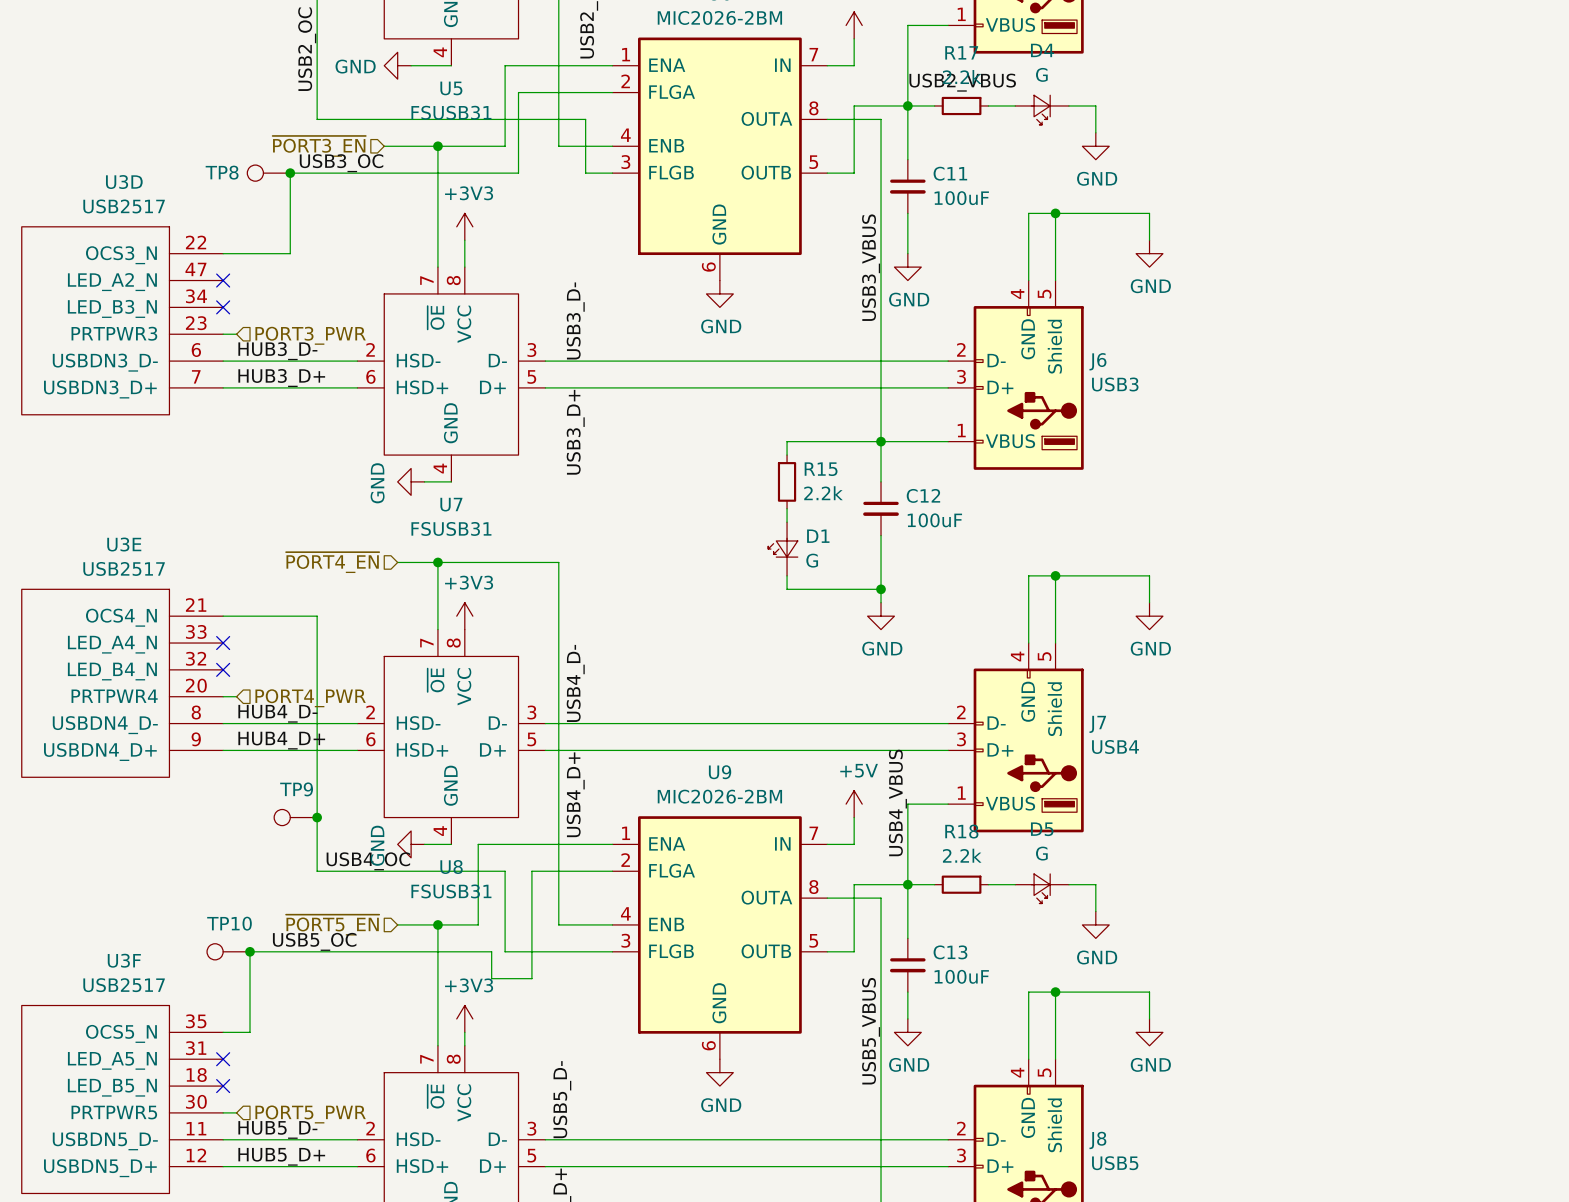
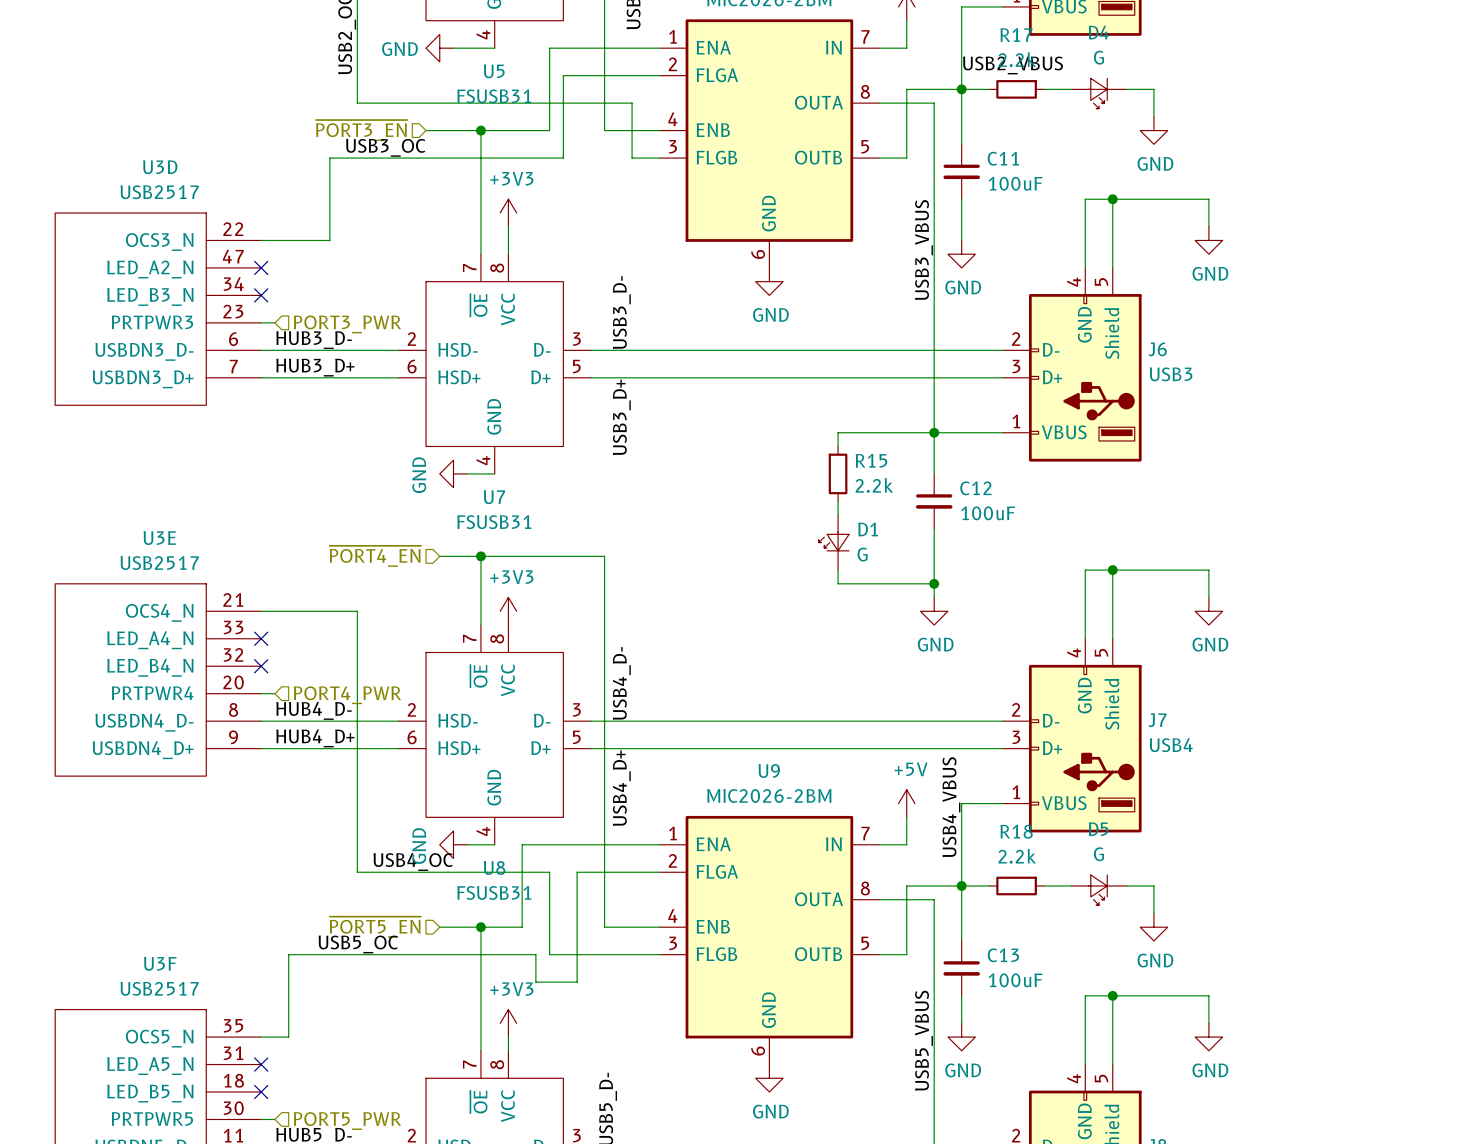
TP8: (268, 173) -> none
junction: (290, 173) -> none
TP9: (295, 817) -> none
junction: (317, 817) -> none
TP10: (228, 951) -> none
junction: (250, 951) -> none

